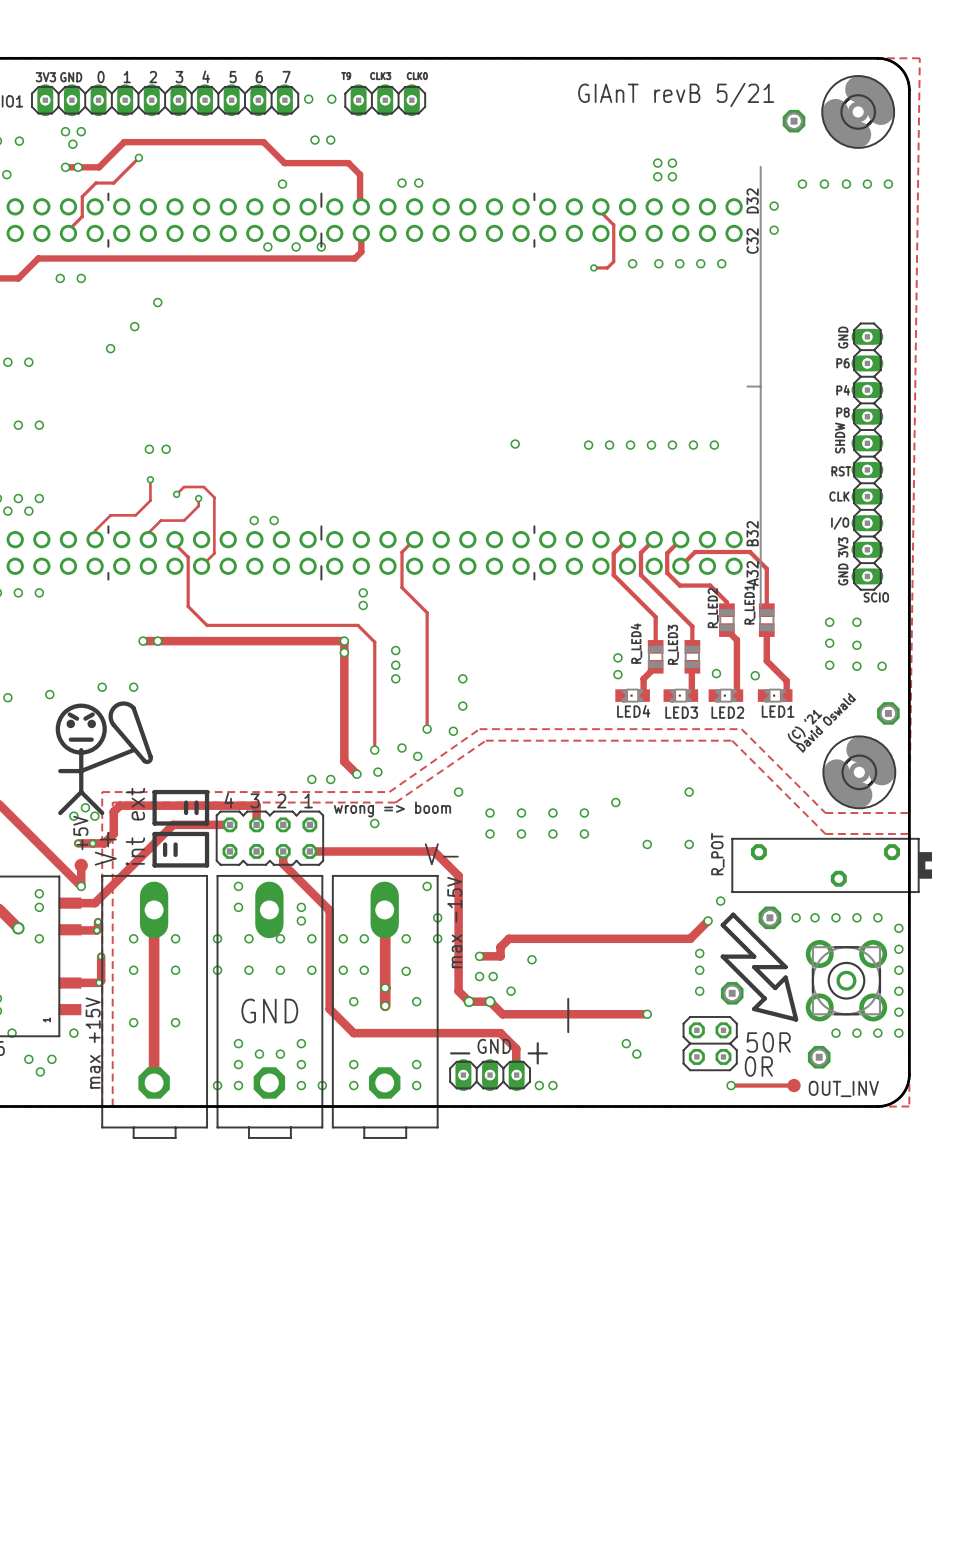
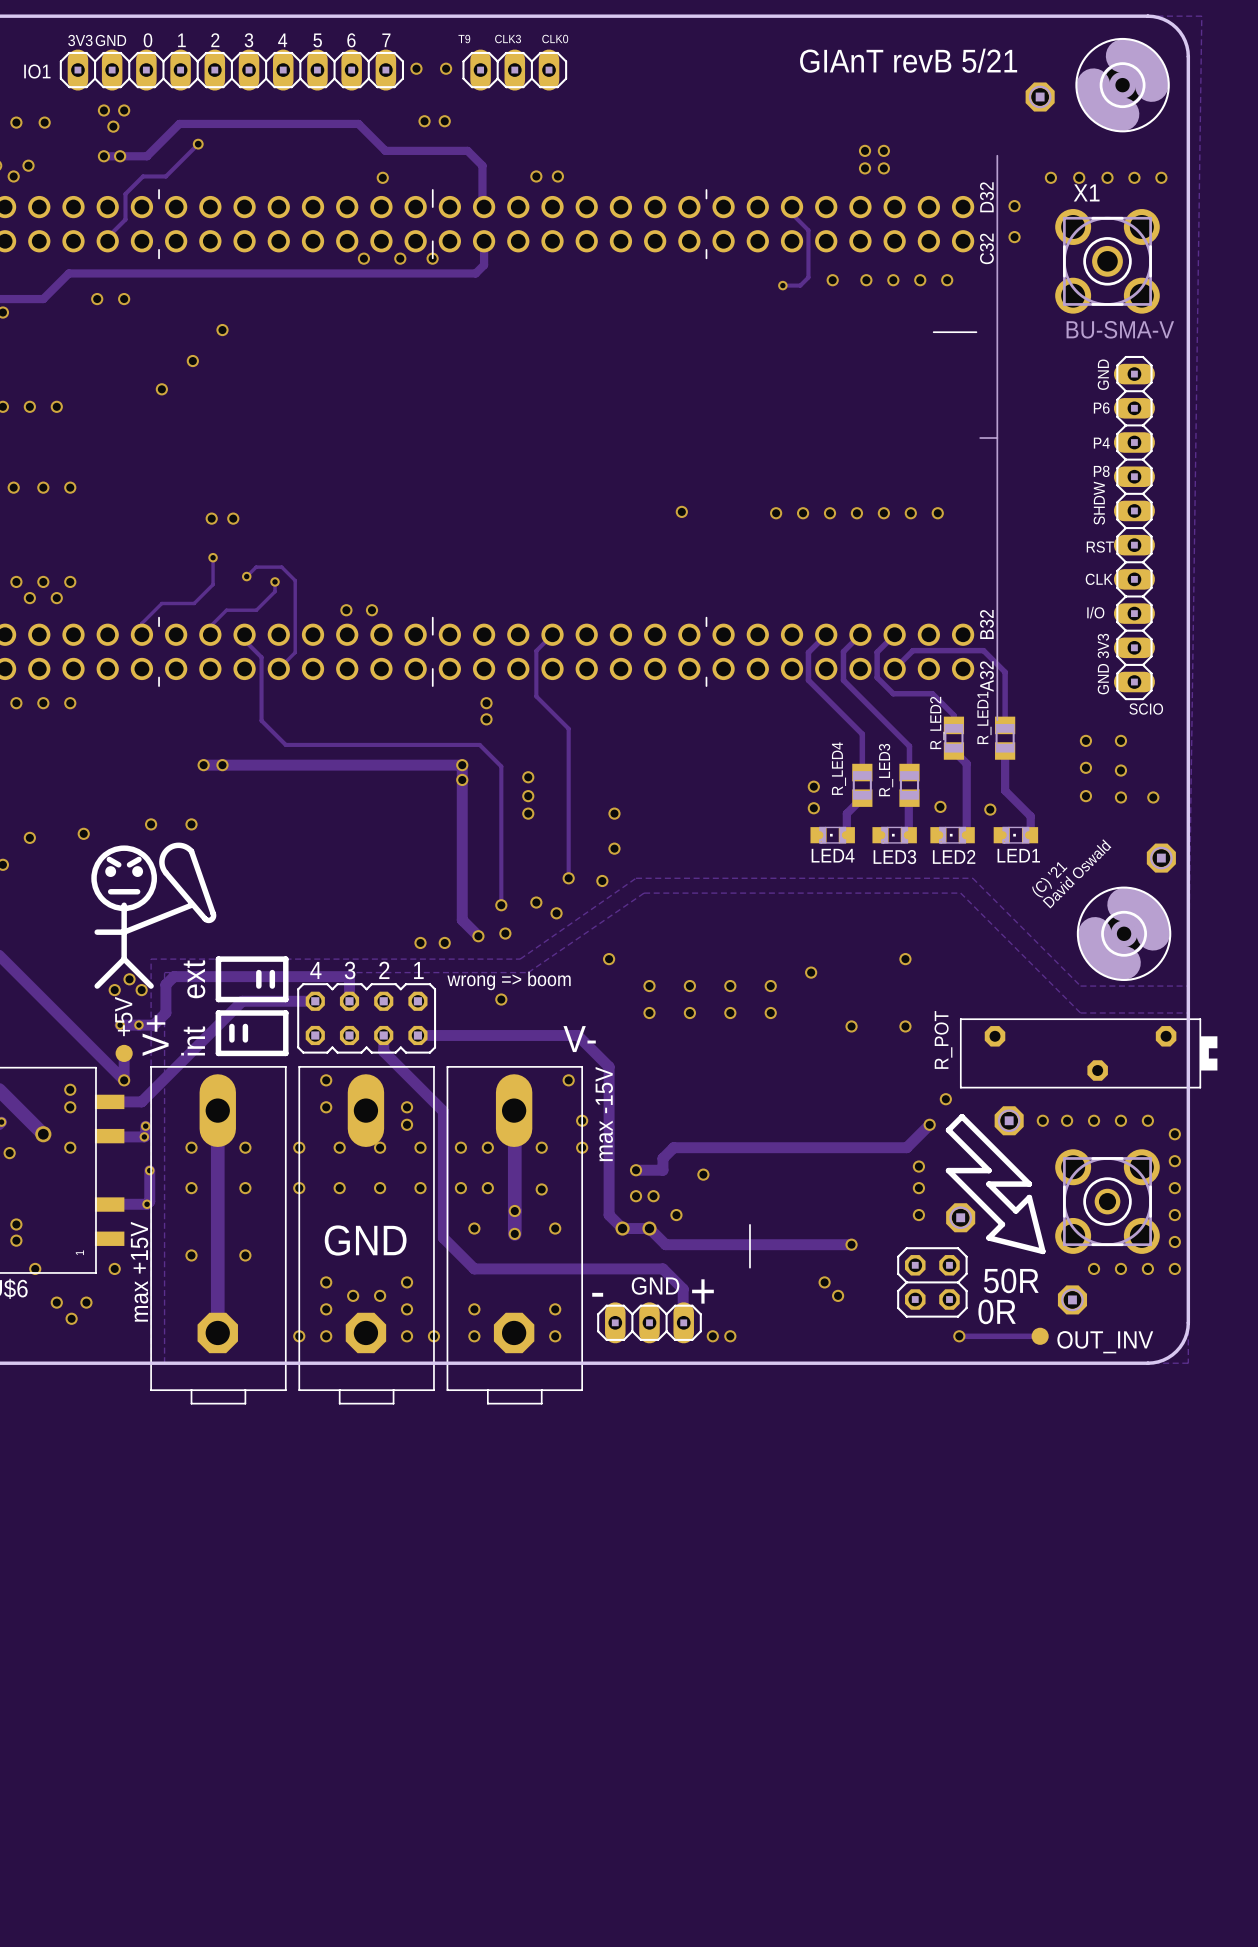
X1: none -> BU-SMA-V (1107, 261)
part: none -> (955, 332)

